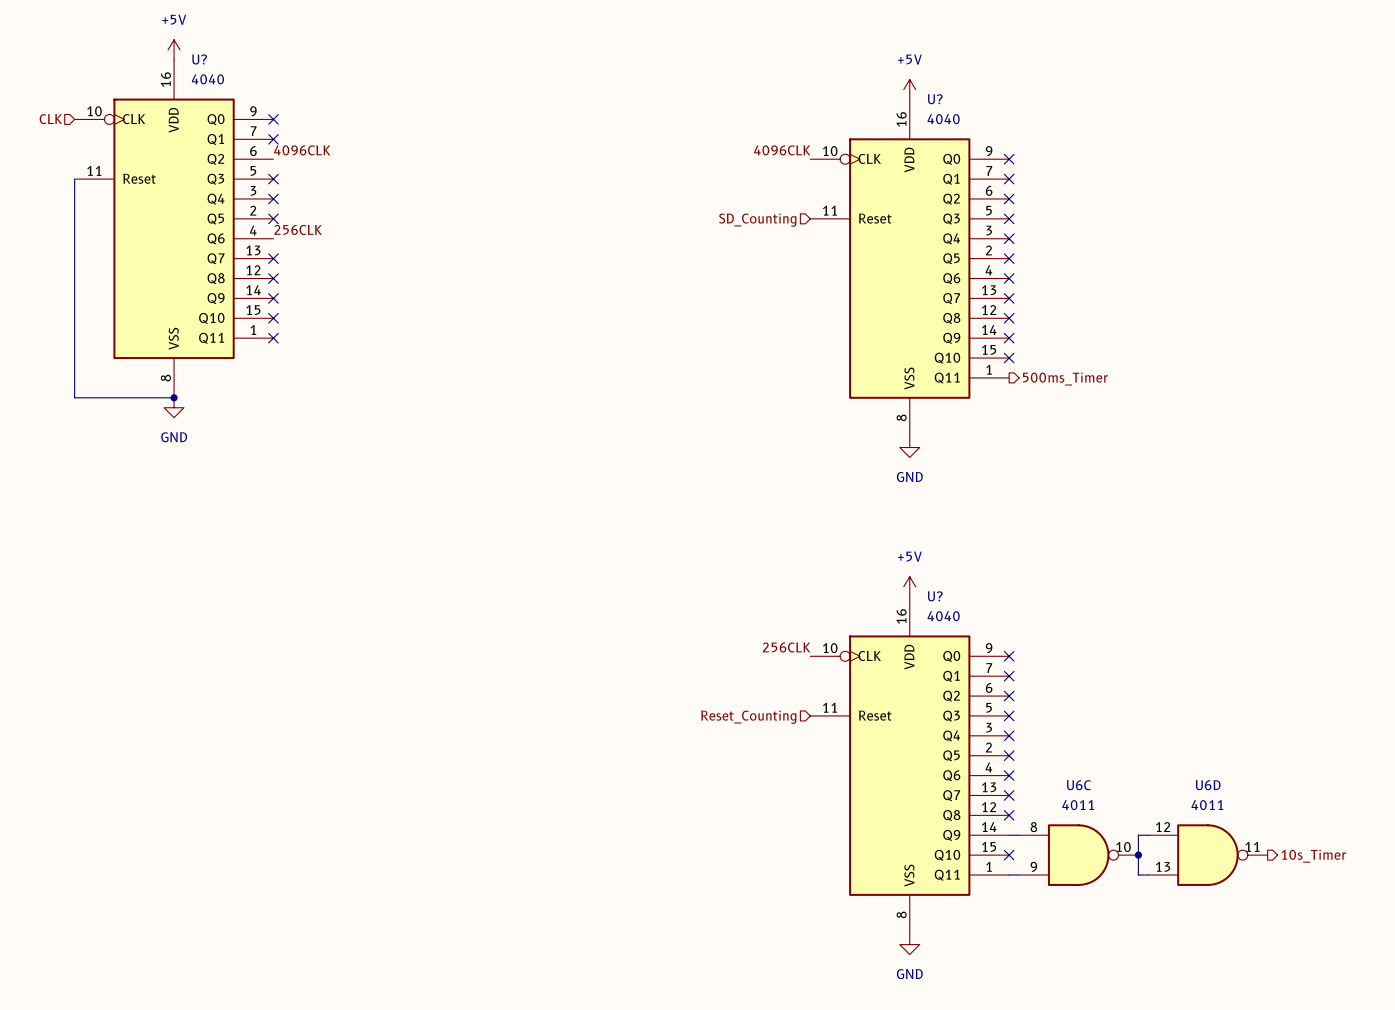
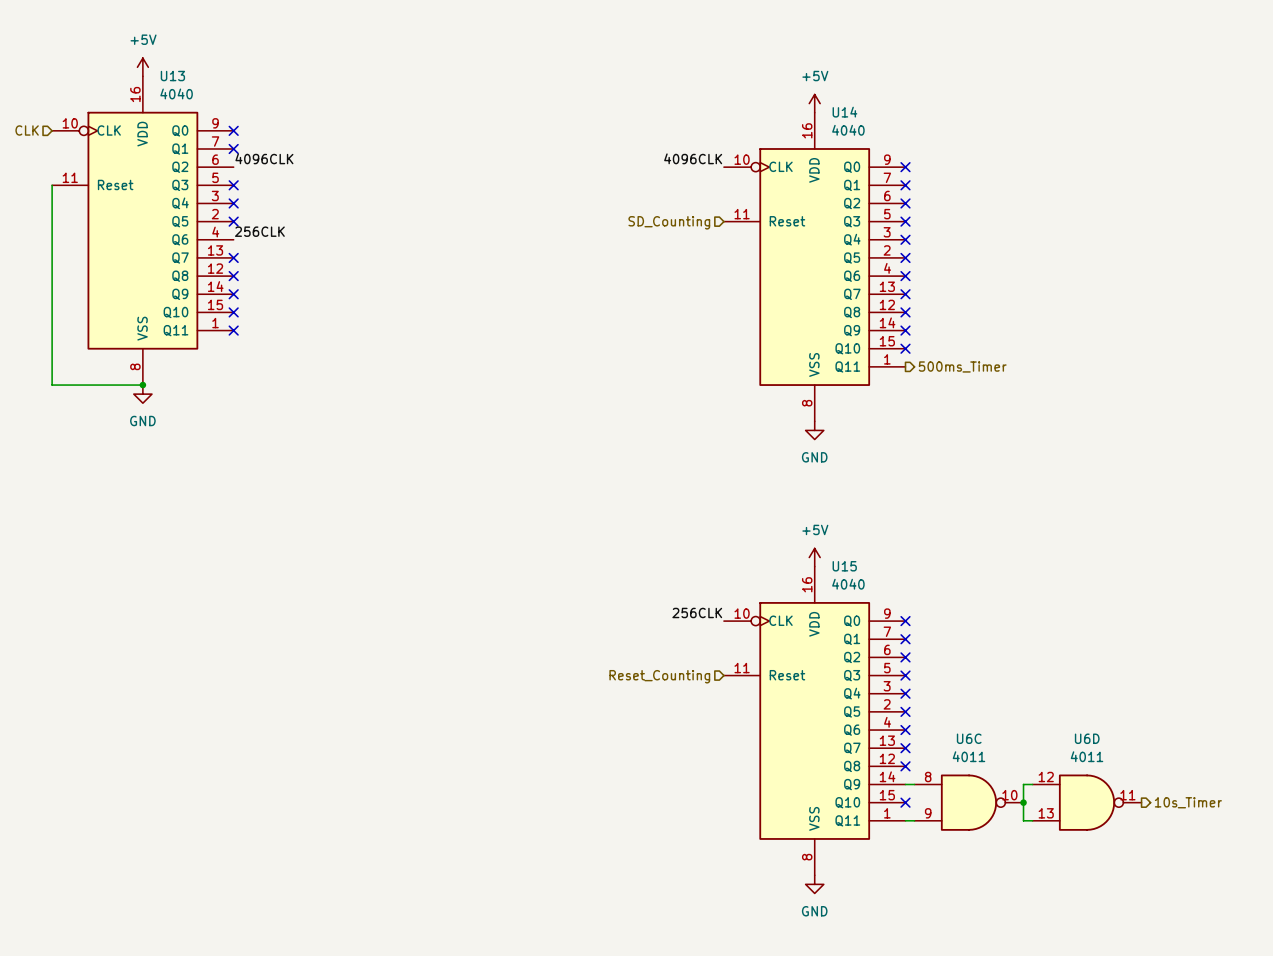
U? name: U? (199, 59) -> U13 (172, 76)
U? name: U? (935, 99) -> U14 (844, 112)
U? name: U? (935, 596) -> U15 (844, 566)

